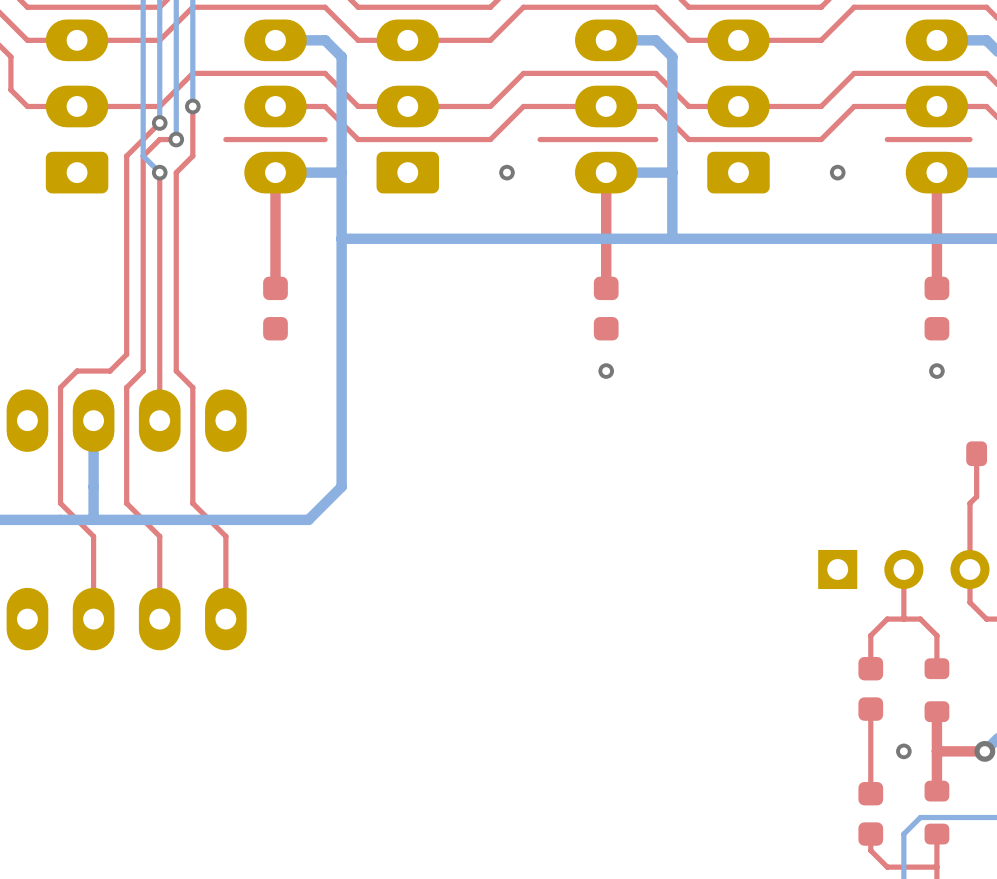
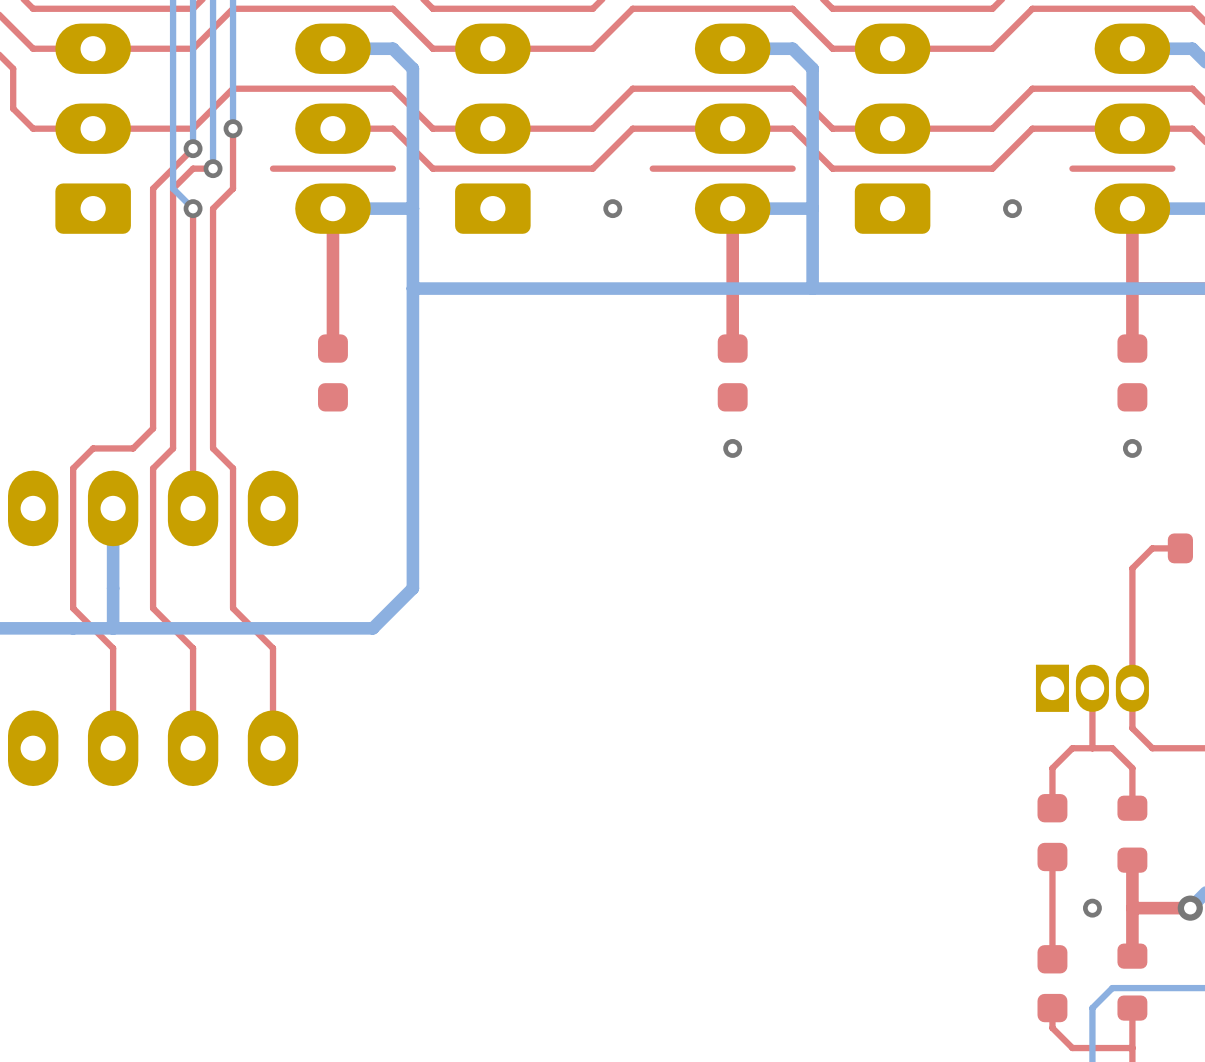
top track: (976, 453) (976, 496) (970, 503) (970, 602) (986, 619) -> (1180, 548) (1152, 548) (1132, 568) (1132, 728) (1152, 748) (1192, 748)
part footprint: [818, 549, 990, 590] -> [1035, 664, 1149, 712]

